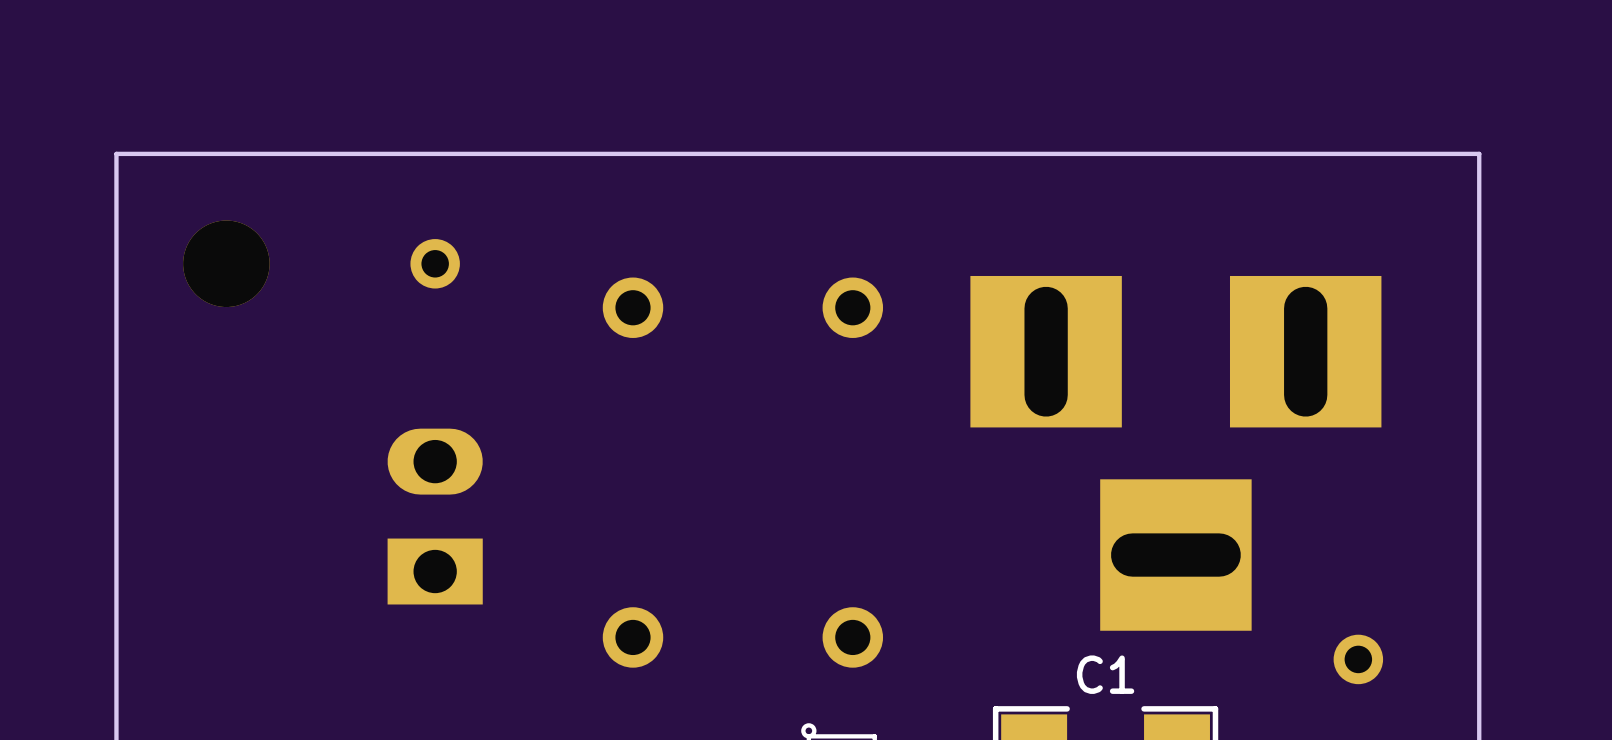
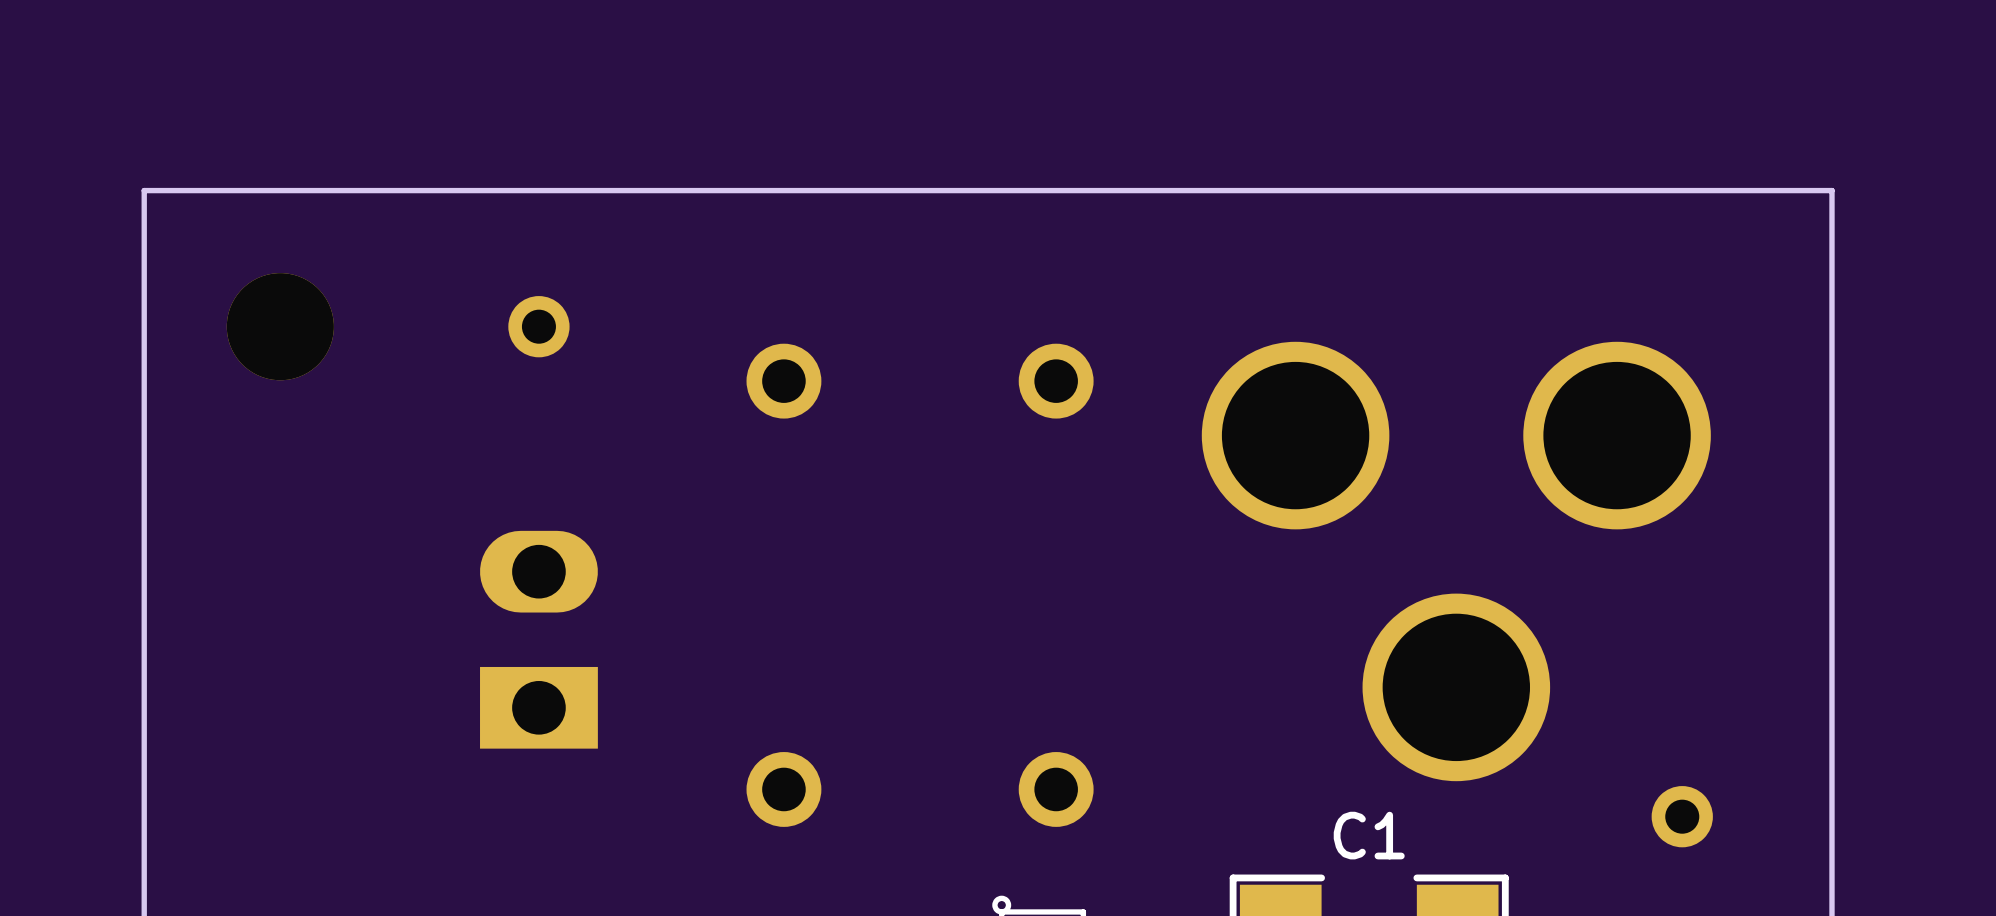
part footprint: [970, 275, 1382, 631] -> [1201, 341, 1711, 782]

